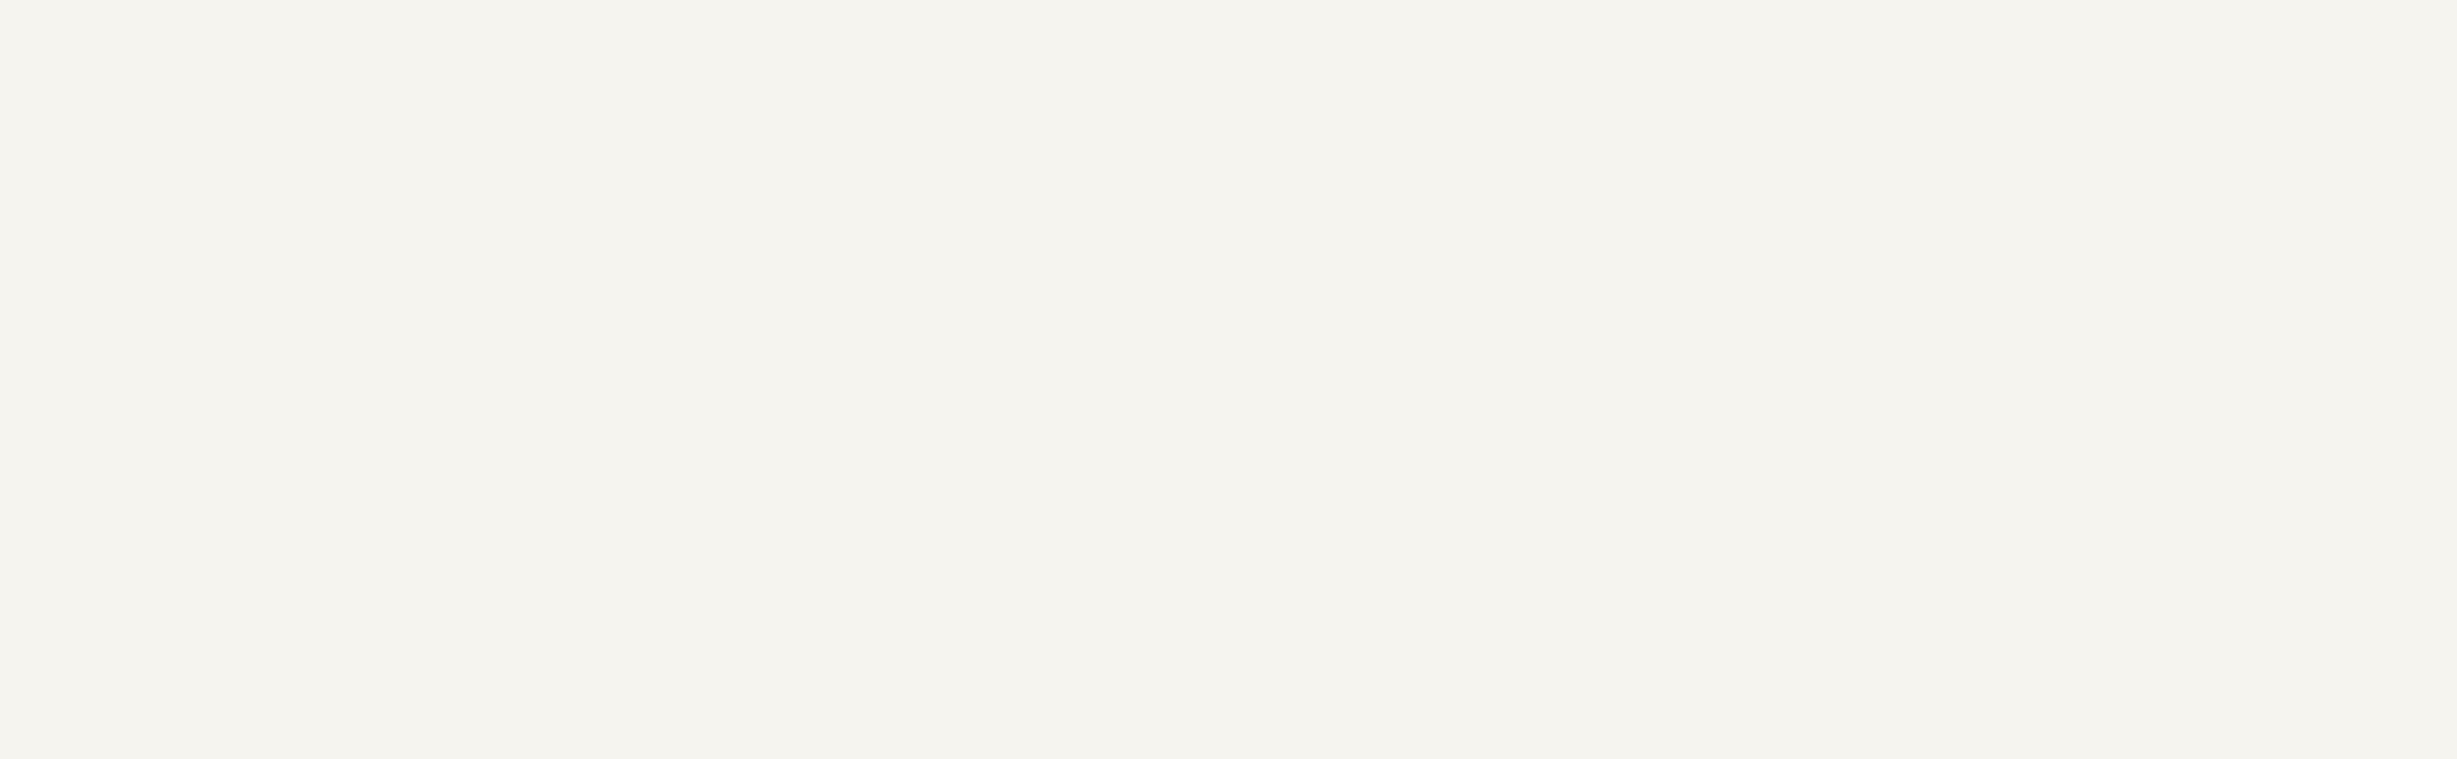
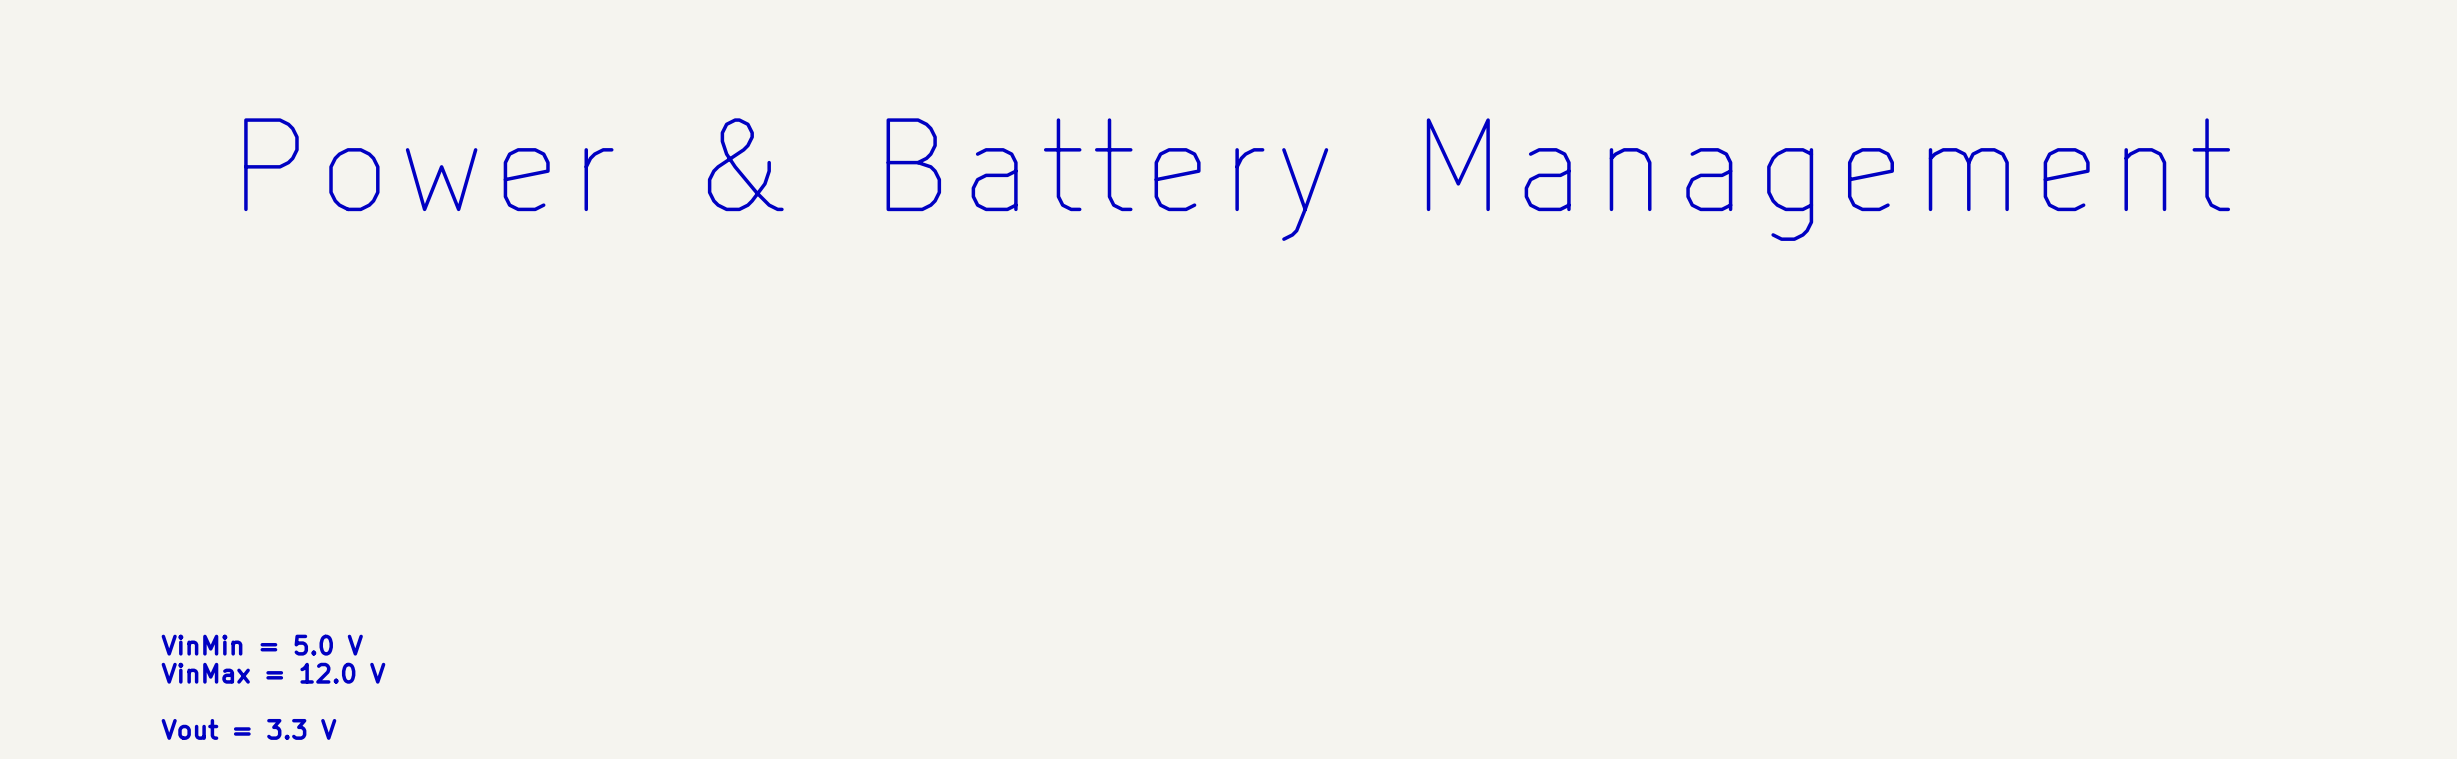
text: none -> Power & Battery Management (1237, 179)
text: none -> VinMin = 5.0 V (262, 645)
text: none -> VinMax = 12.0 V (273, 673)
text: none -> Vout = 3.3 V (248, 729)

